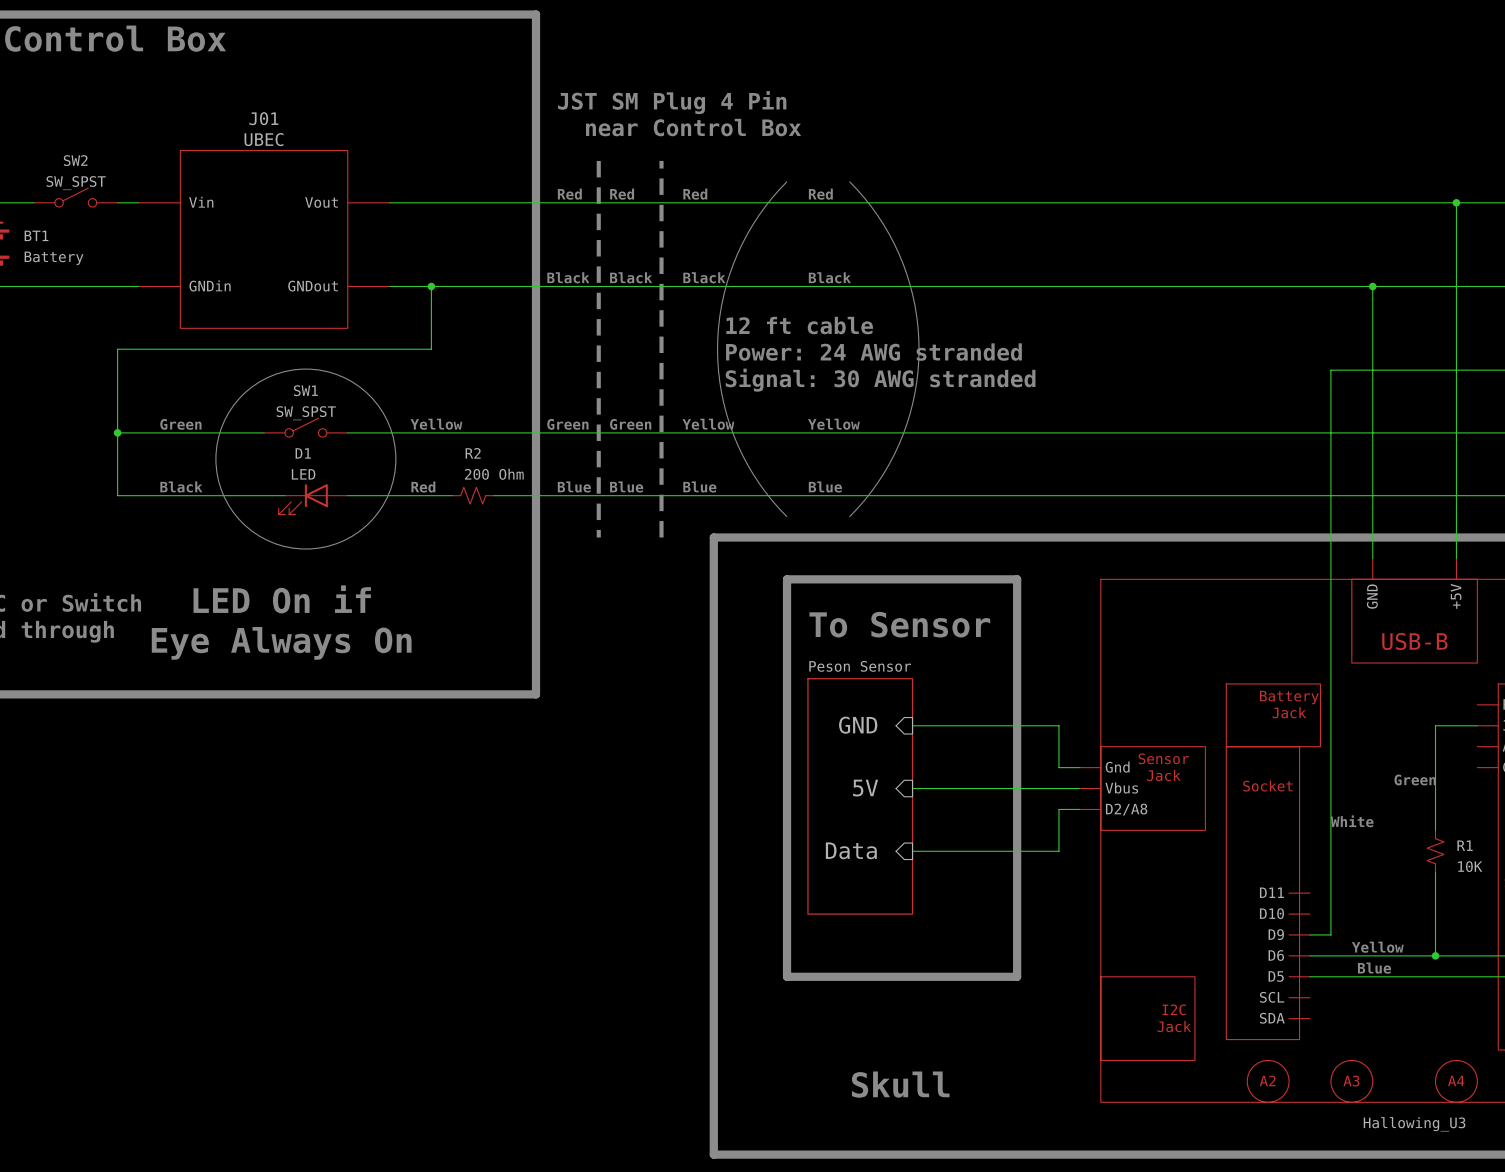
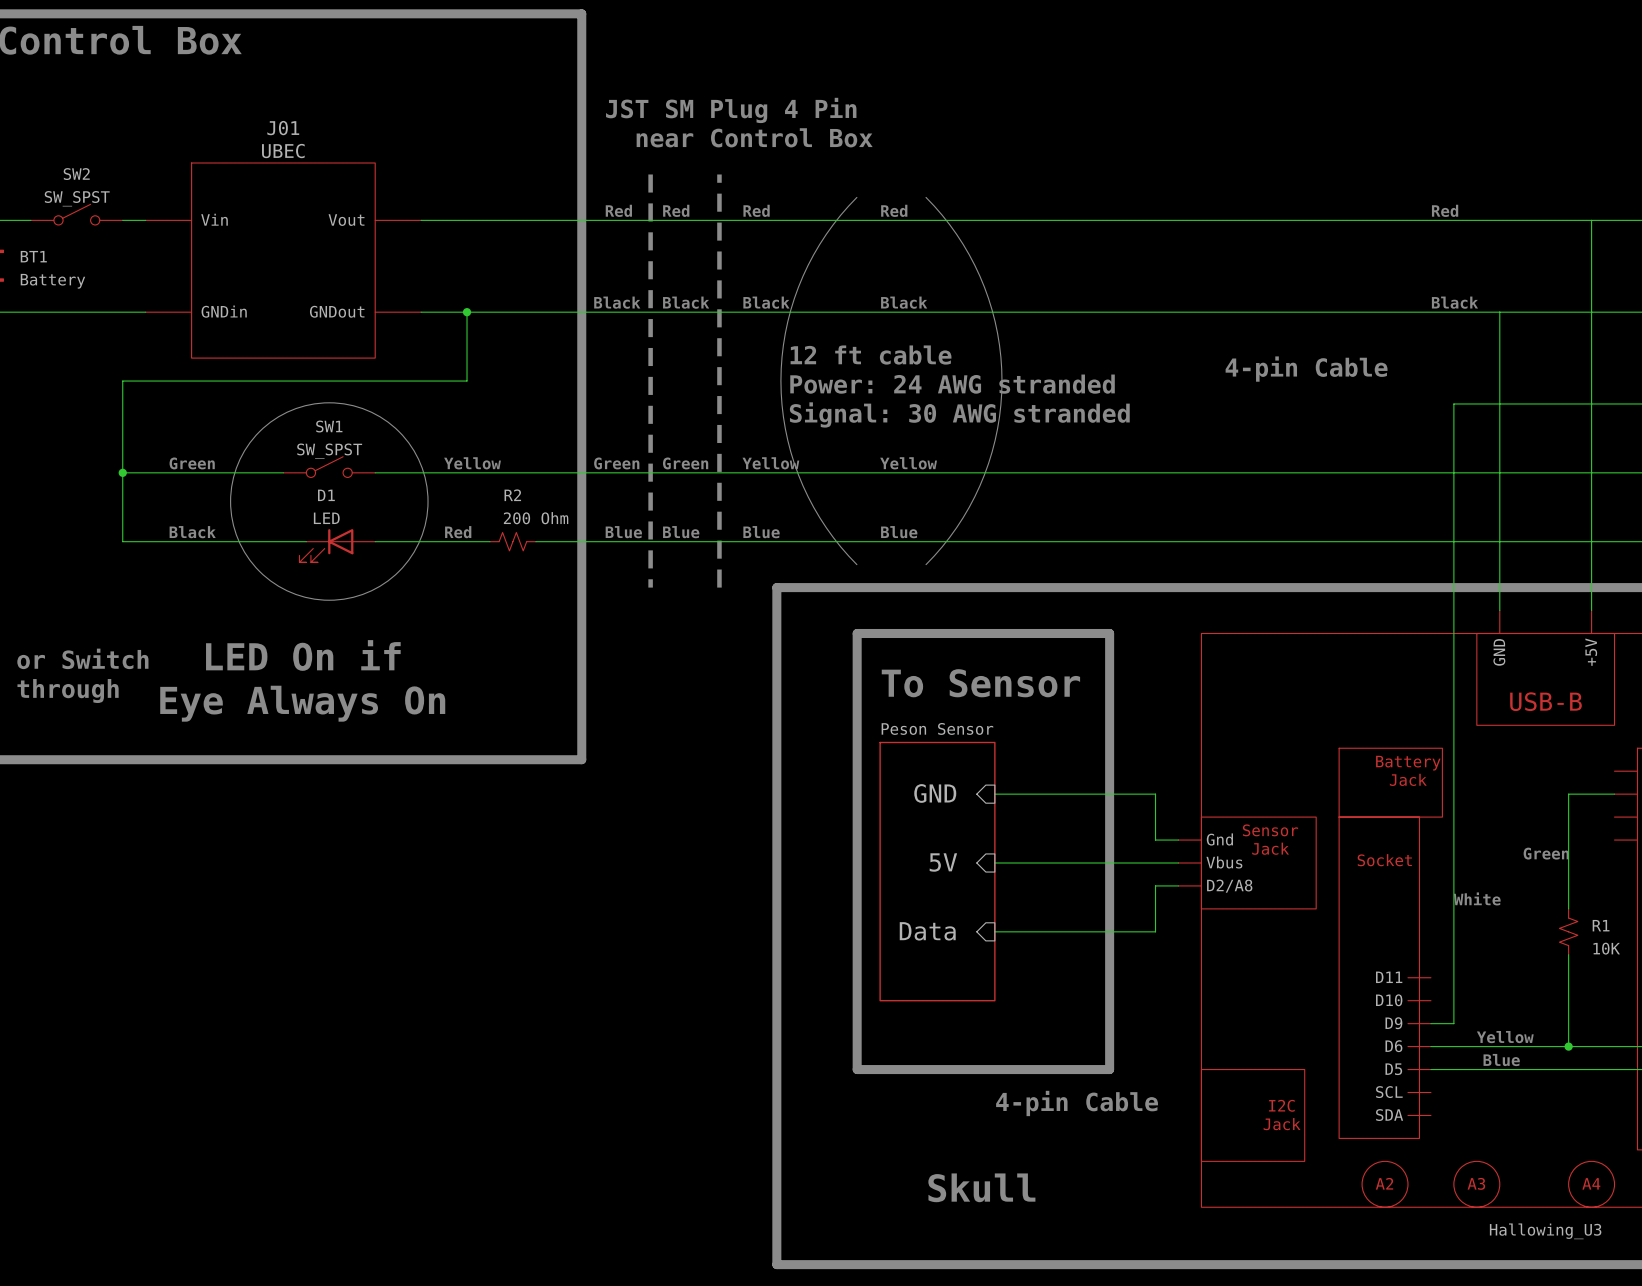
text: none -> Red (1445, 210)
junction: (1456, 202) -> none
text: none -> Black (1454, 302)
junction: (1372, 286) -> none
text: none -> 4-pin Cable (1306, 369)
text: none -> 4-pin Cable (1077, 1103)

